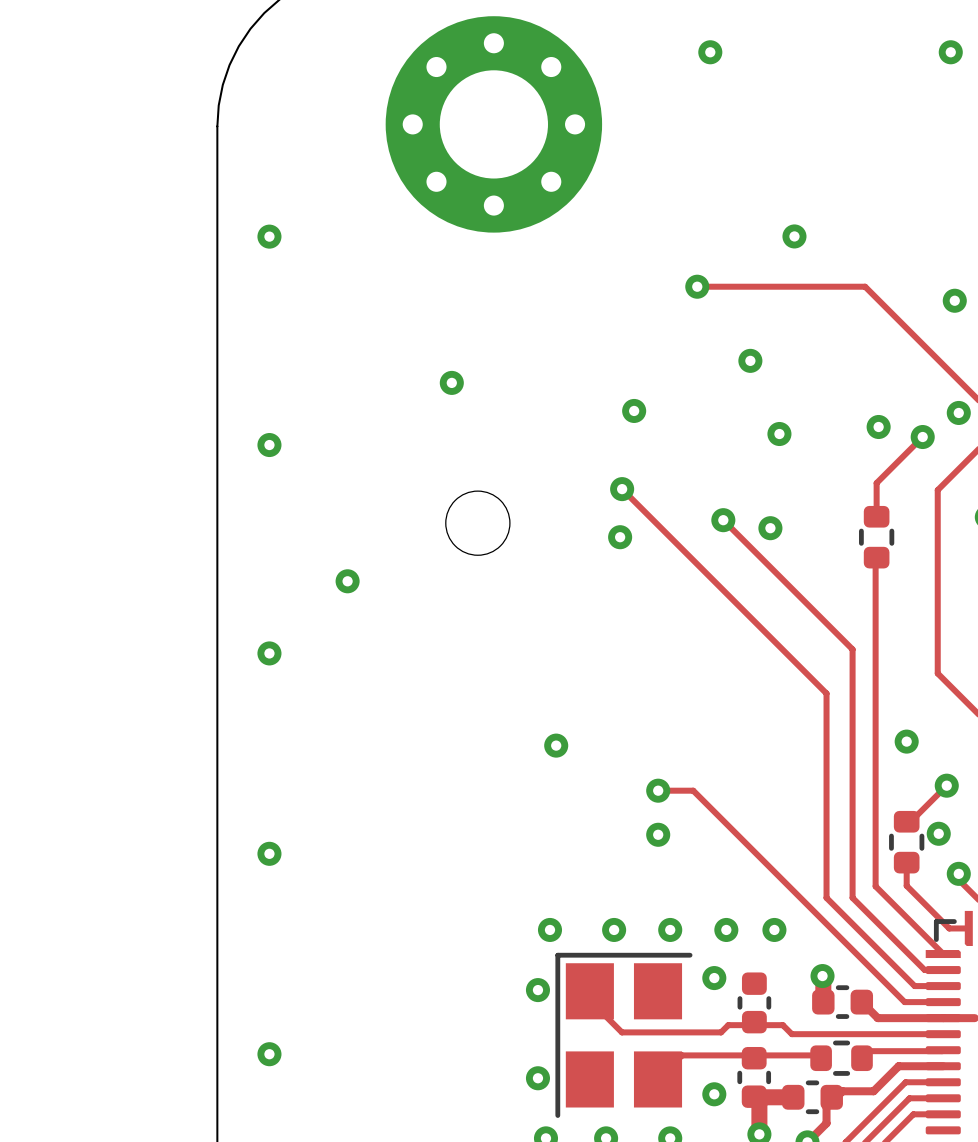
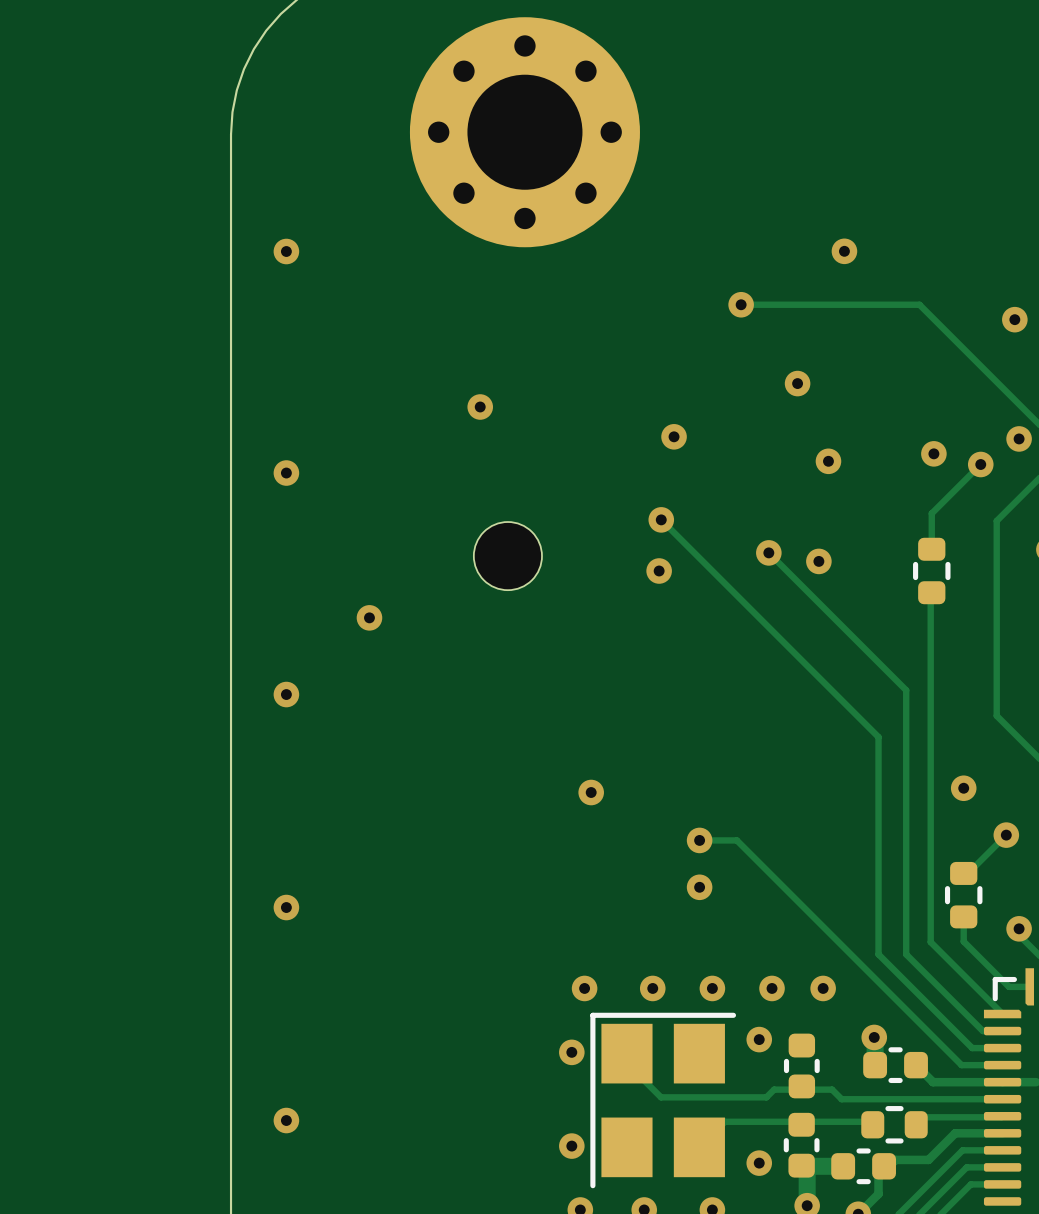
via: (710, 52) -> none
via: (950, 52) -> none
via: (938, 833) -> none

